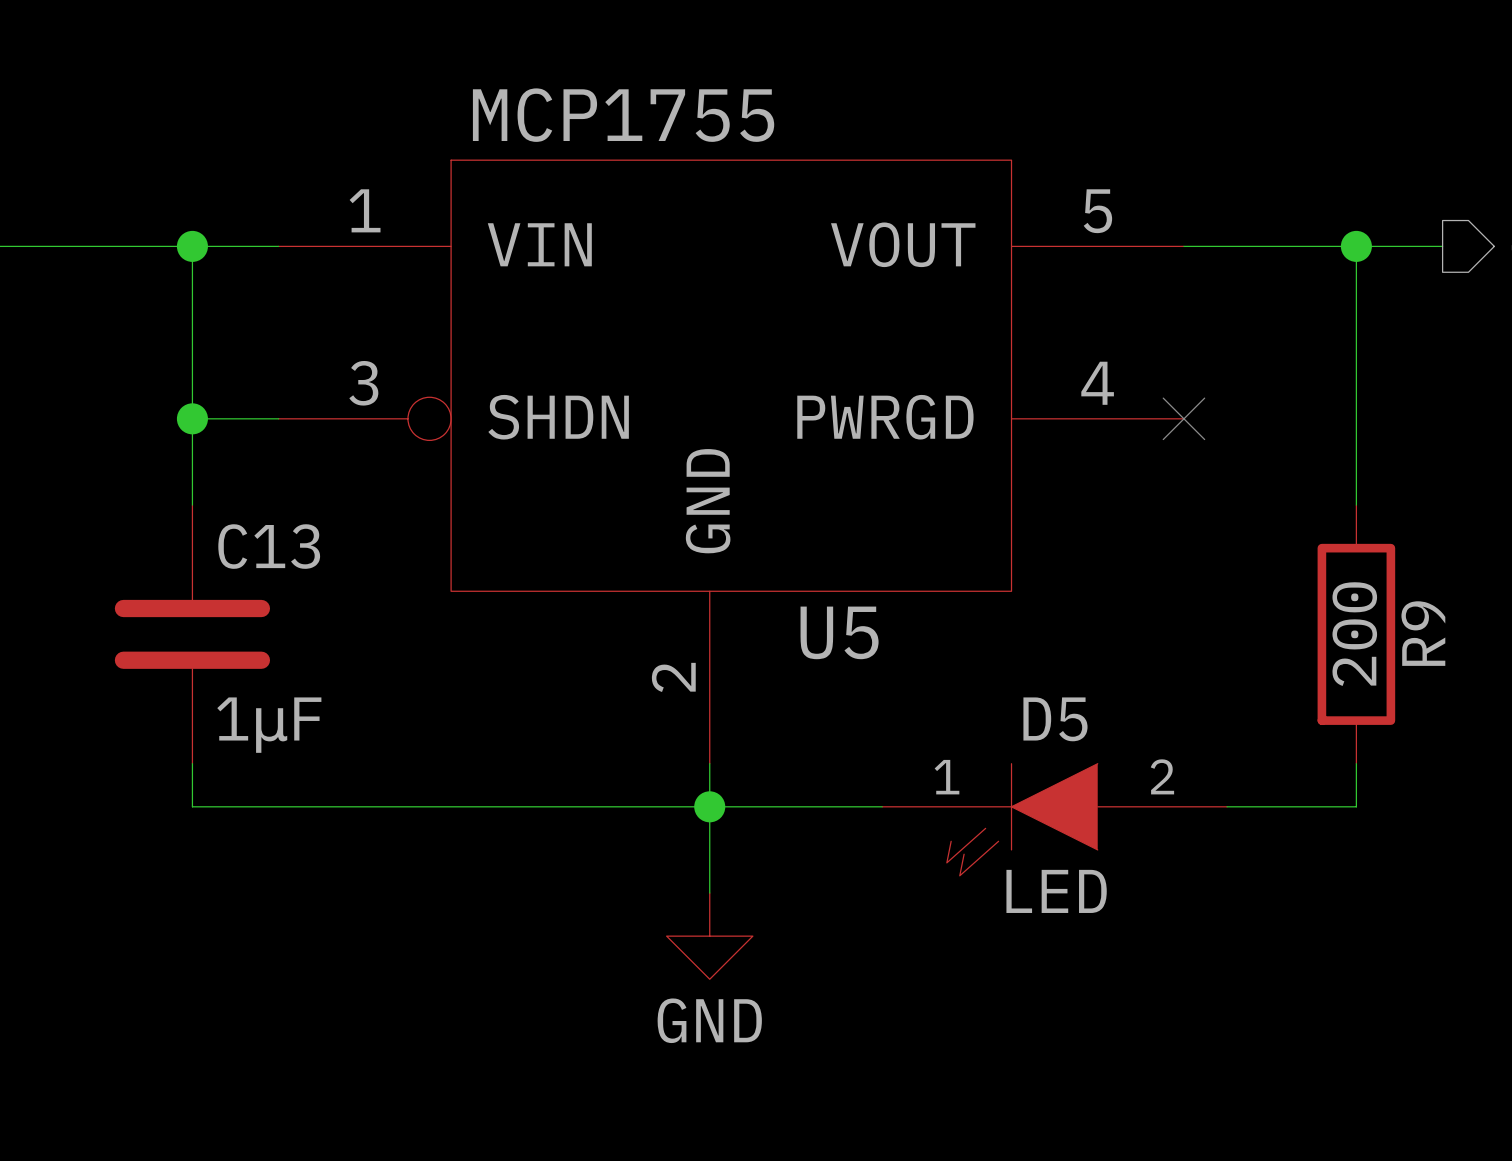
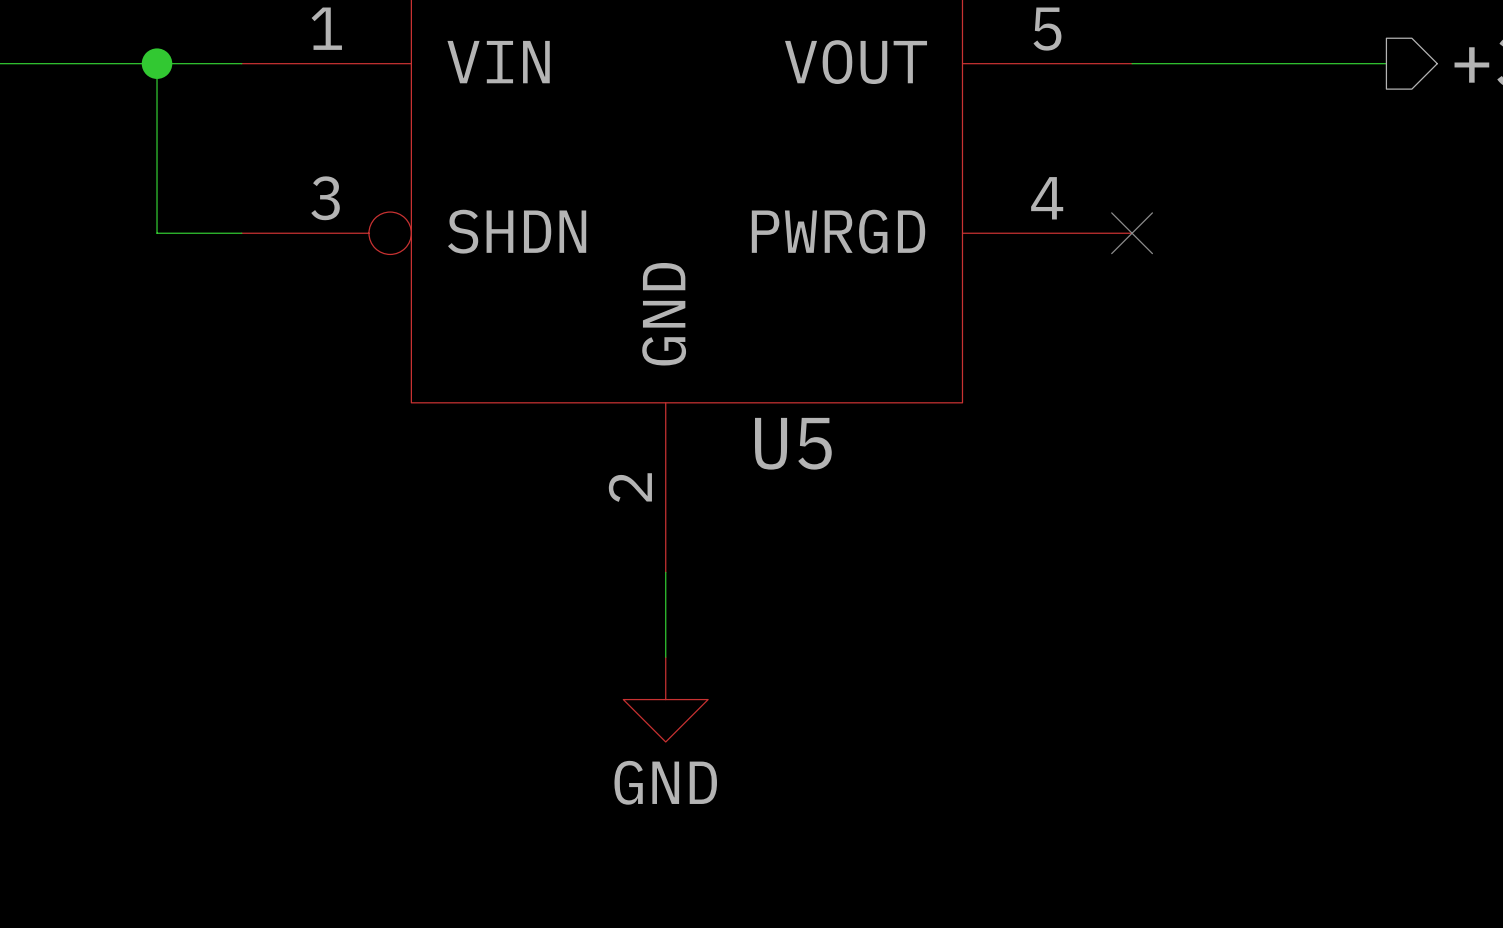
wire: (1356, 246) (1356, 505) -> none
junction: (1356, 246) -> none
wire: (192, 418) (192, 505) -> none
junction: (192, 418) -> none
C13: 1μF (192, 634) -> none
R9: 200 (1356, 634) -> none
wire: (192, 763) (192, 806) (882, 806) -> none
wire: (1356, 763) (1356, 806) (1227, 806) -> none
junction: (709, 806) -> none
D5: LED (1054, 819) -> none
power symbol position: GND (709, 936) -> GND (665, 699)

